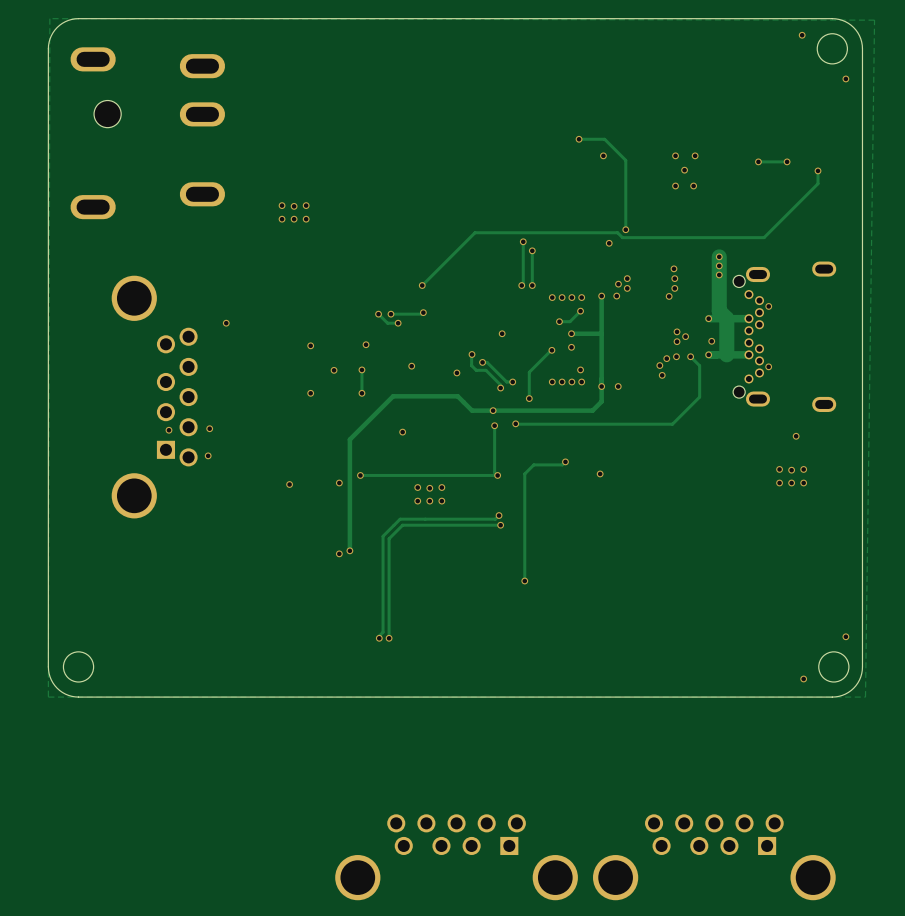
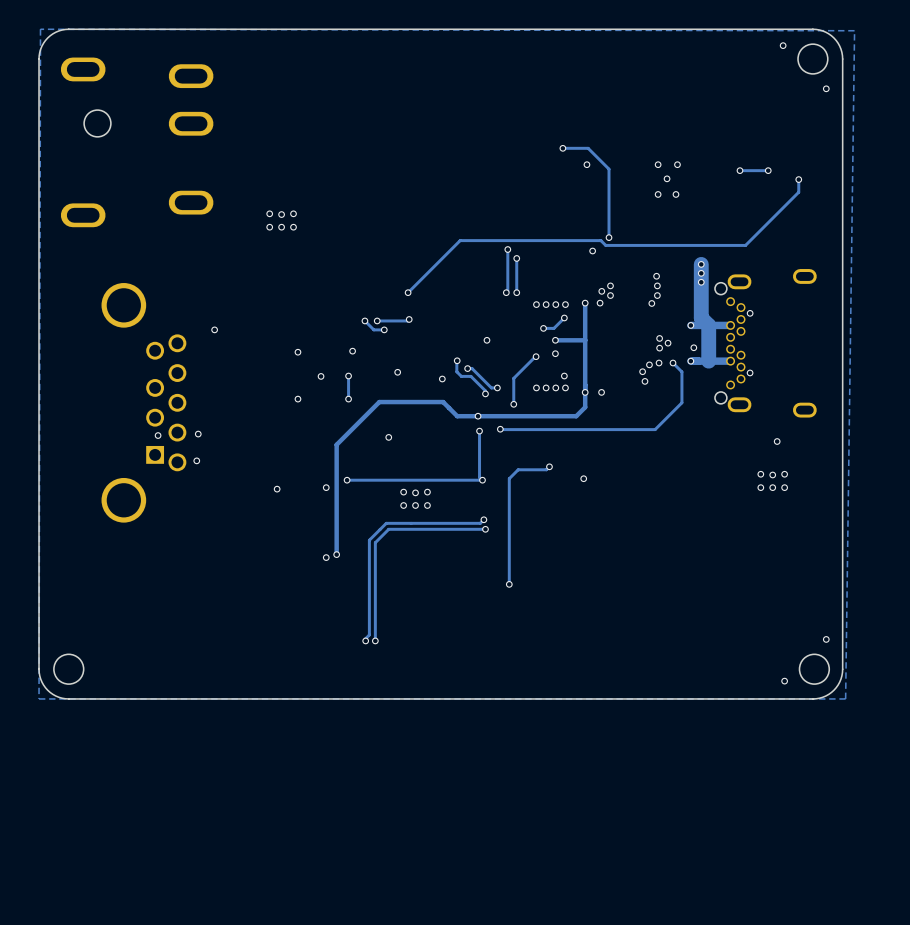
part: (456, 857) -> none
part: (714, 857) -> none

